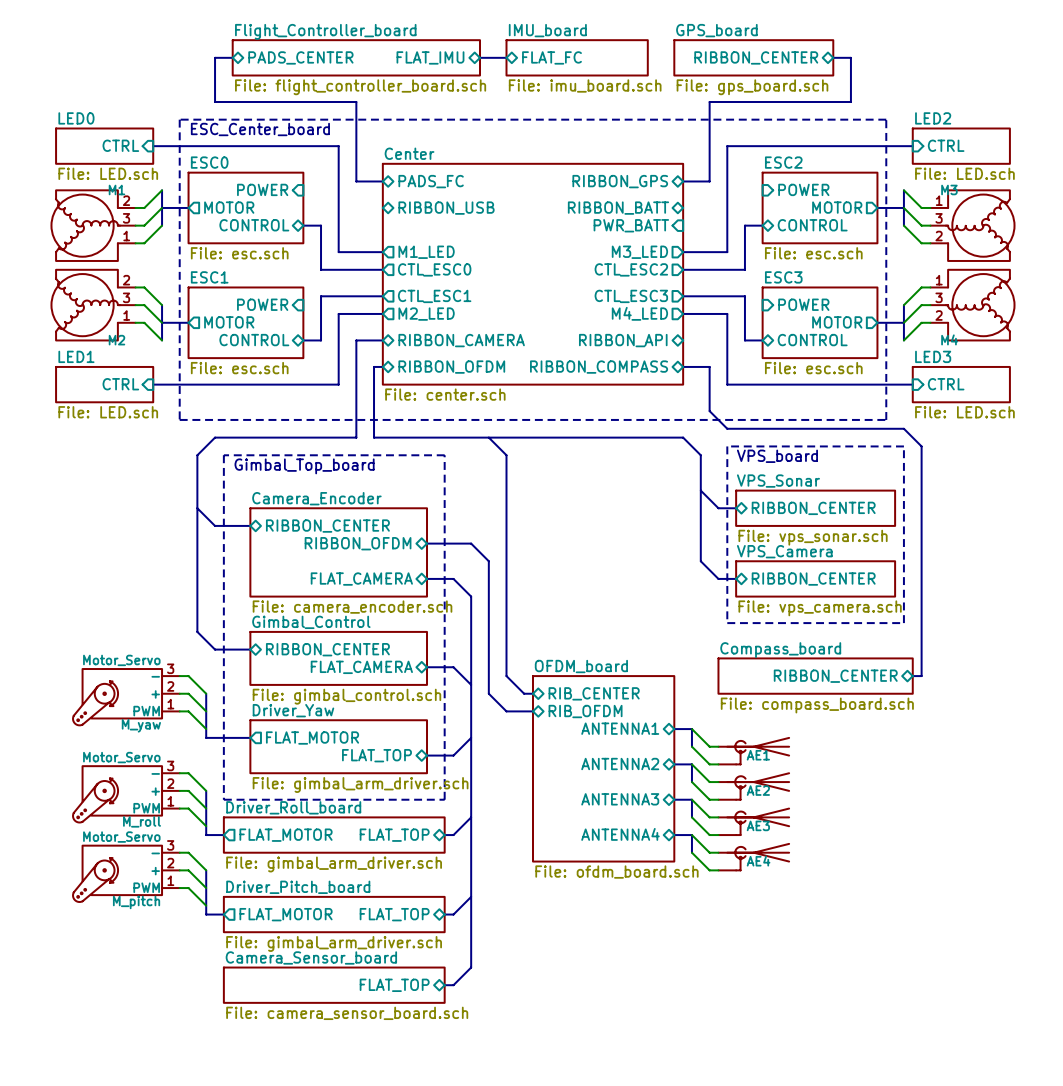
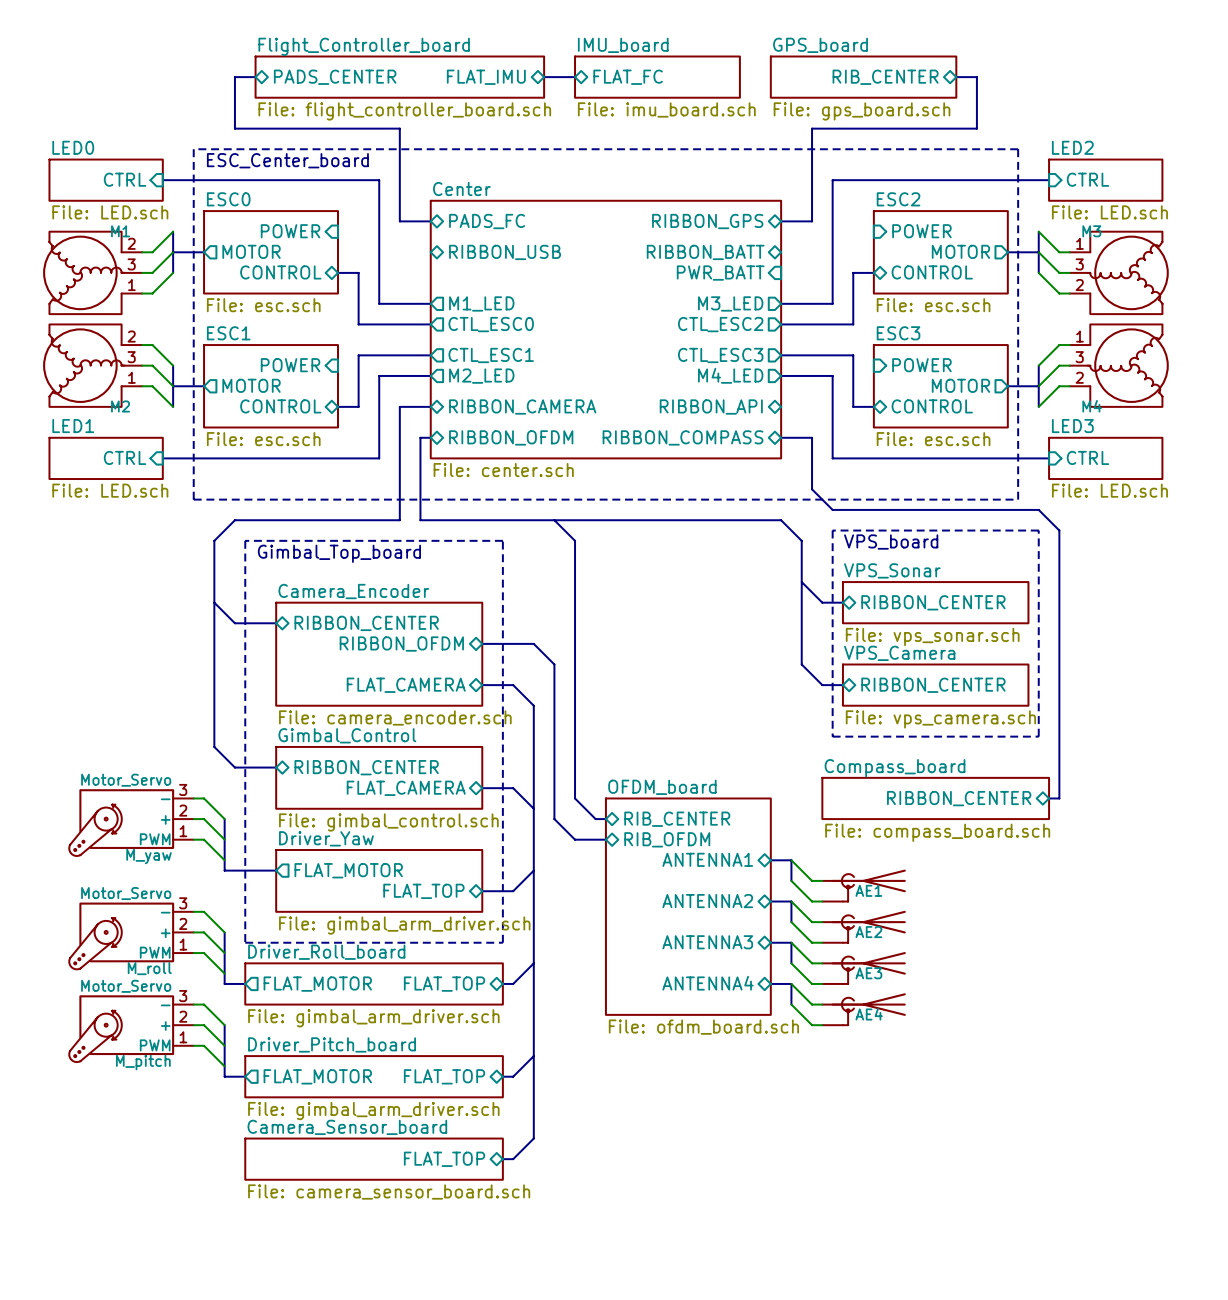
sheet pin: RIBBON_CENTER (756, 57) -> RIB_CENTER (885, 77)

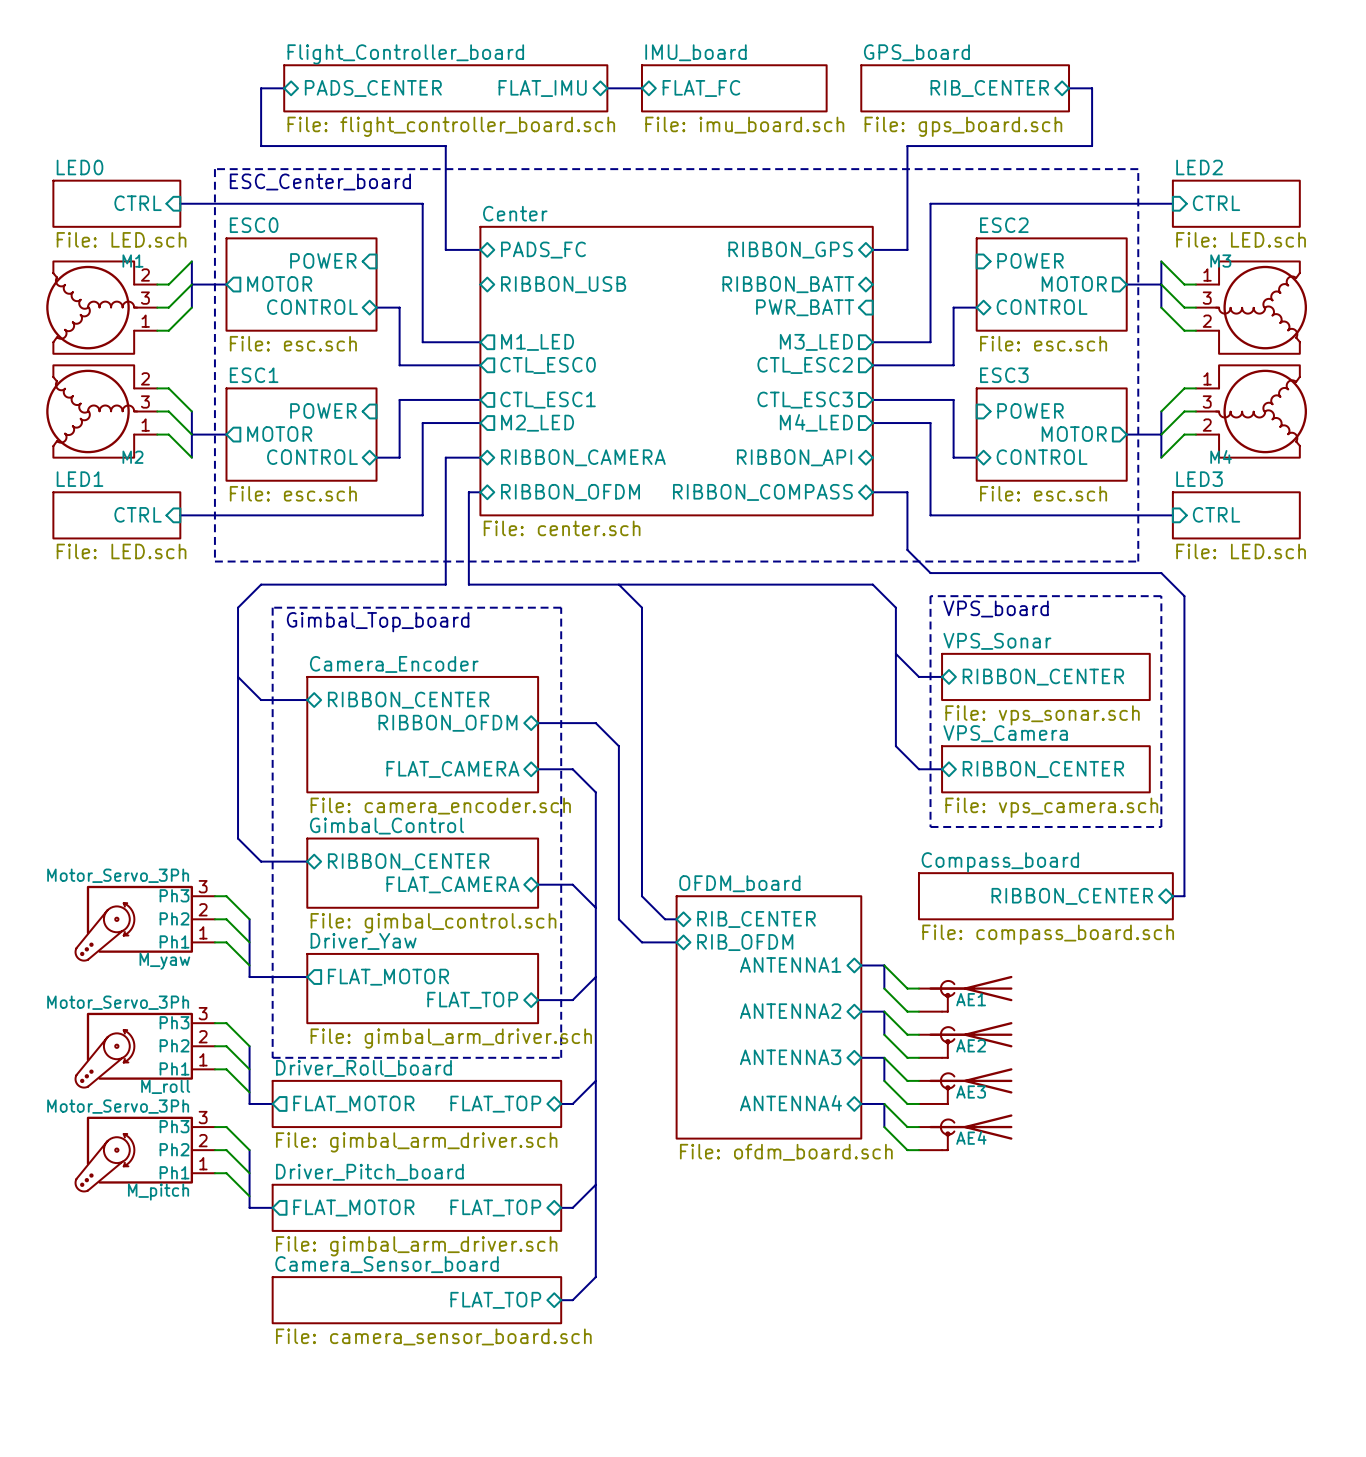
M_yaw value: Motor_Servo (126, 780) -> Motor_Servo_3Ph (118, 875)
M_yaw pin name: - (165, 799) -> Ph3 (174, 895)
M_yaw pin name: + (165, 819) -> Ph2 (174, 918)
M_yaw pin name: PWM (155, 839) -> Ph1 (174, 941)
M_roll value: Motor_Servo (126, 893) -> Motor_Servo_3Ph (118, 1002)
M_roll pin name: - (165, 912) -> Ph3 (174, 1022)
M_roll pin name: + (165, 933) -> Ph2 (174, 1045)
M_roll pin name: PWM (155, 952) -> Ph1 (174, 1068)
M_pitch value: Motor_Servo (126, 986) -> Motor_Servo_3Ph (118, 1106)
M_pitch pin name: - (165, 1005) -> Ph3 (174, 1126)
M_pitch pin name: + (165, 1026) -> Ph2 (174, 1149)
M_pitch pin name: PWM (155, 1045) -> Ph1 (174, 1172)

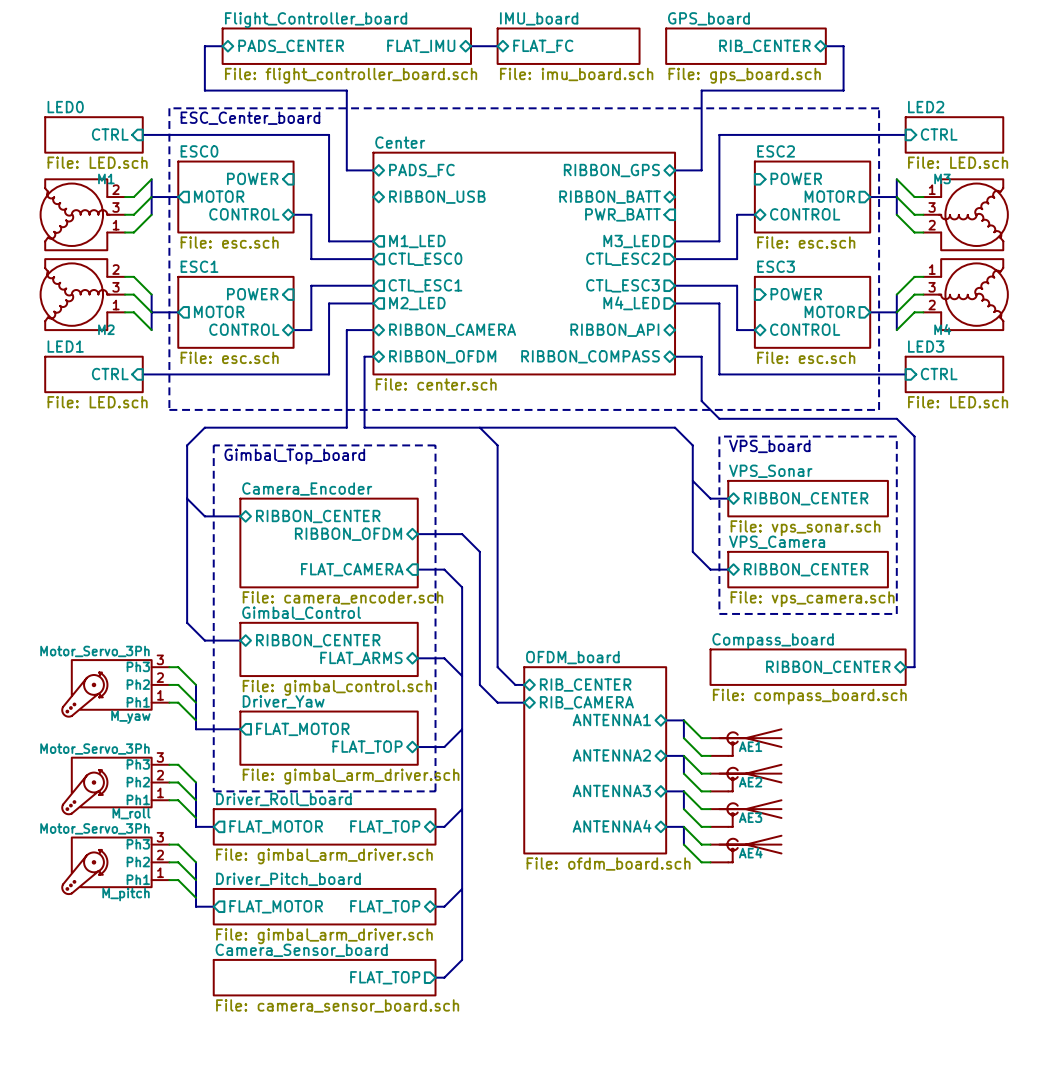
sheet pin shape: bidirectional (452, 769) -> input (352, 569)
sheet pin: FLAT_CAMERA (452, 884) -> FLAT_ARMS (361, 658)
sheet pin: RIB_OFDM (745, 942) -> RIB_CAMERA (586, 702)
sheet pin shape: bidirectional (495, 1300) -> output (385, 977)

